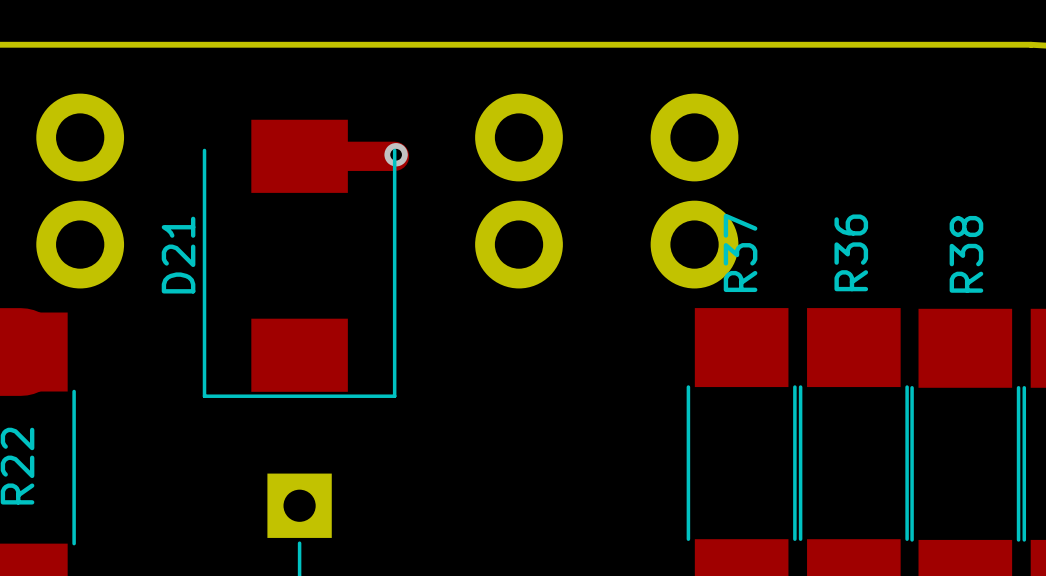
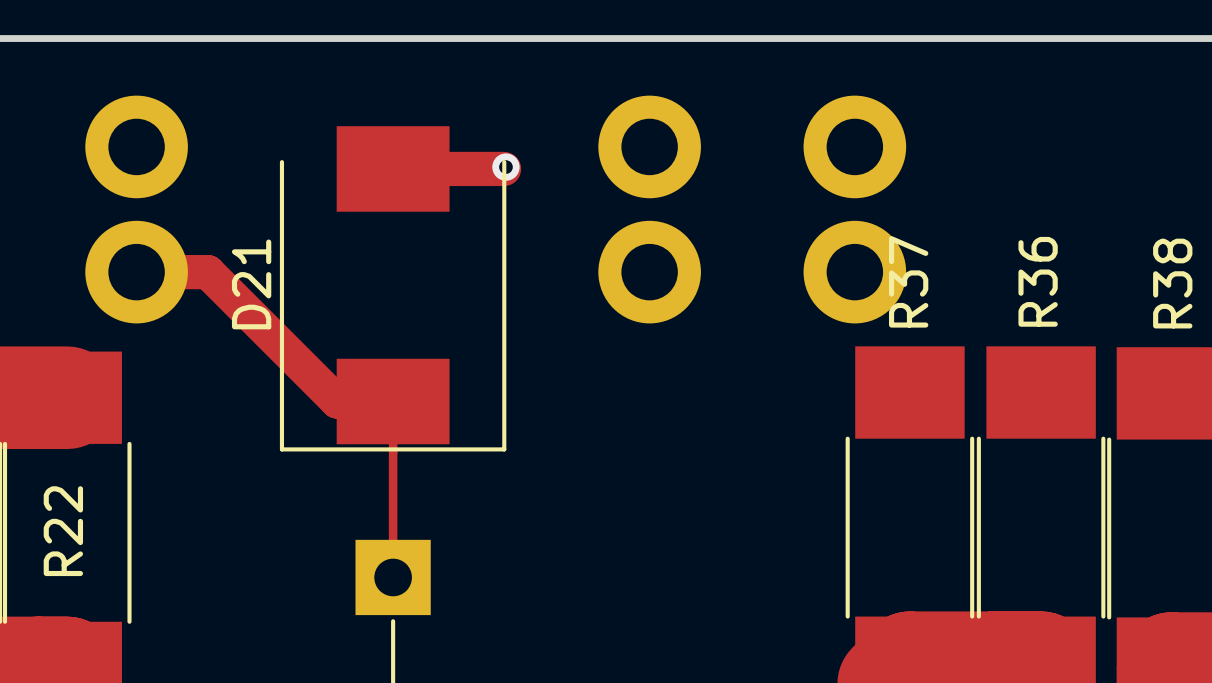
track: none -> (136, 272) (207, 272) (337, 401) (393, 401) (393, 577)

